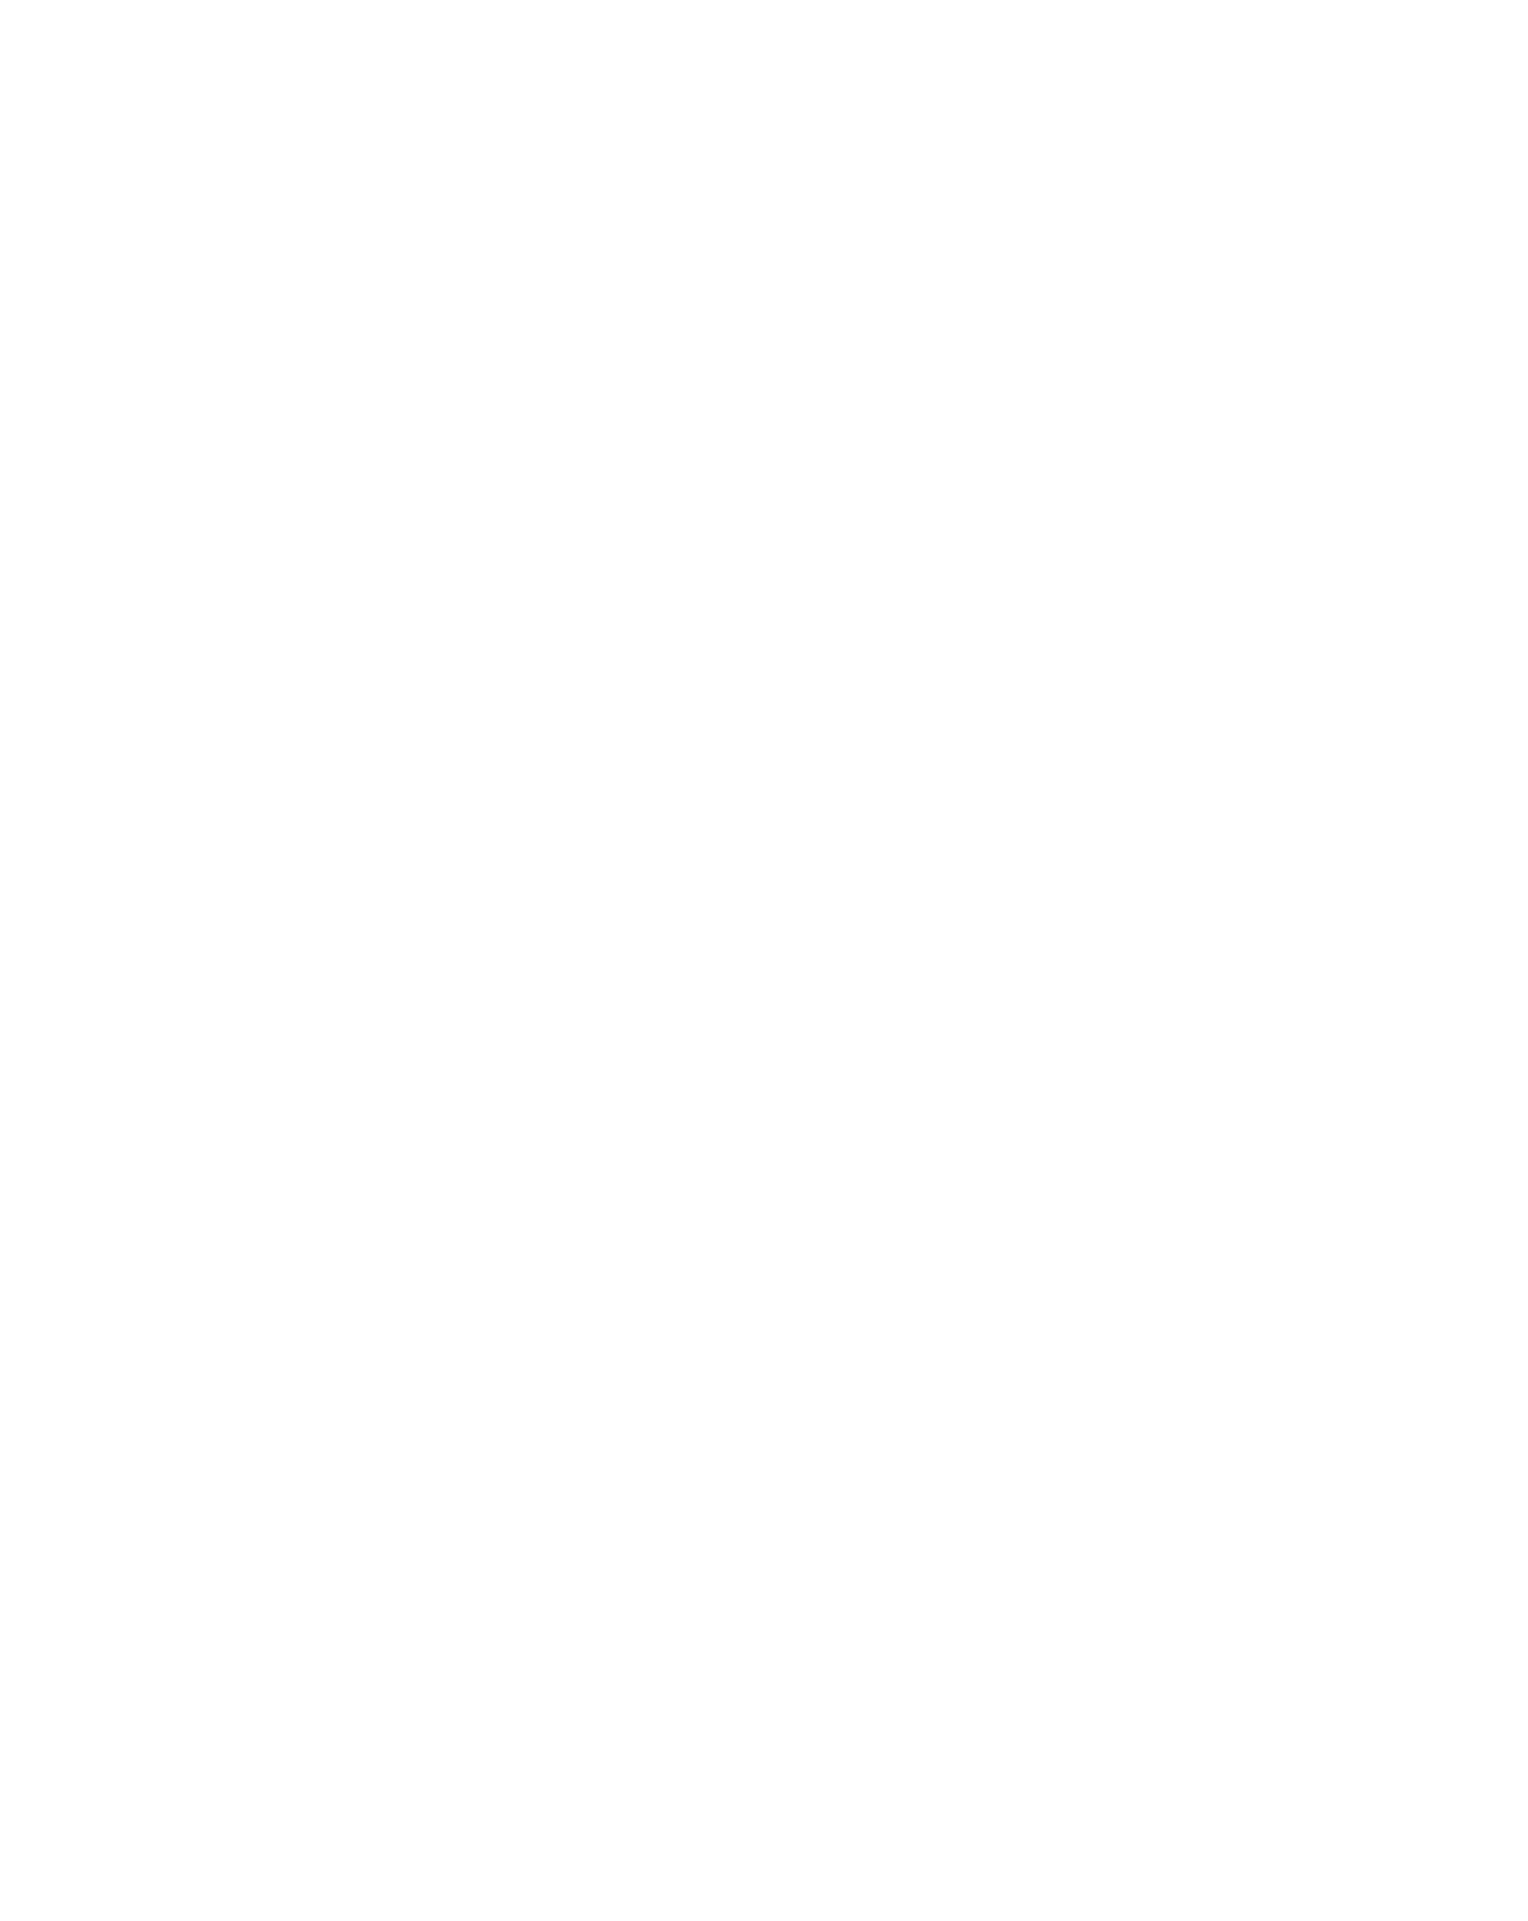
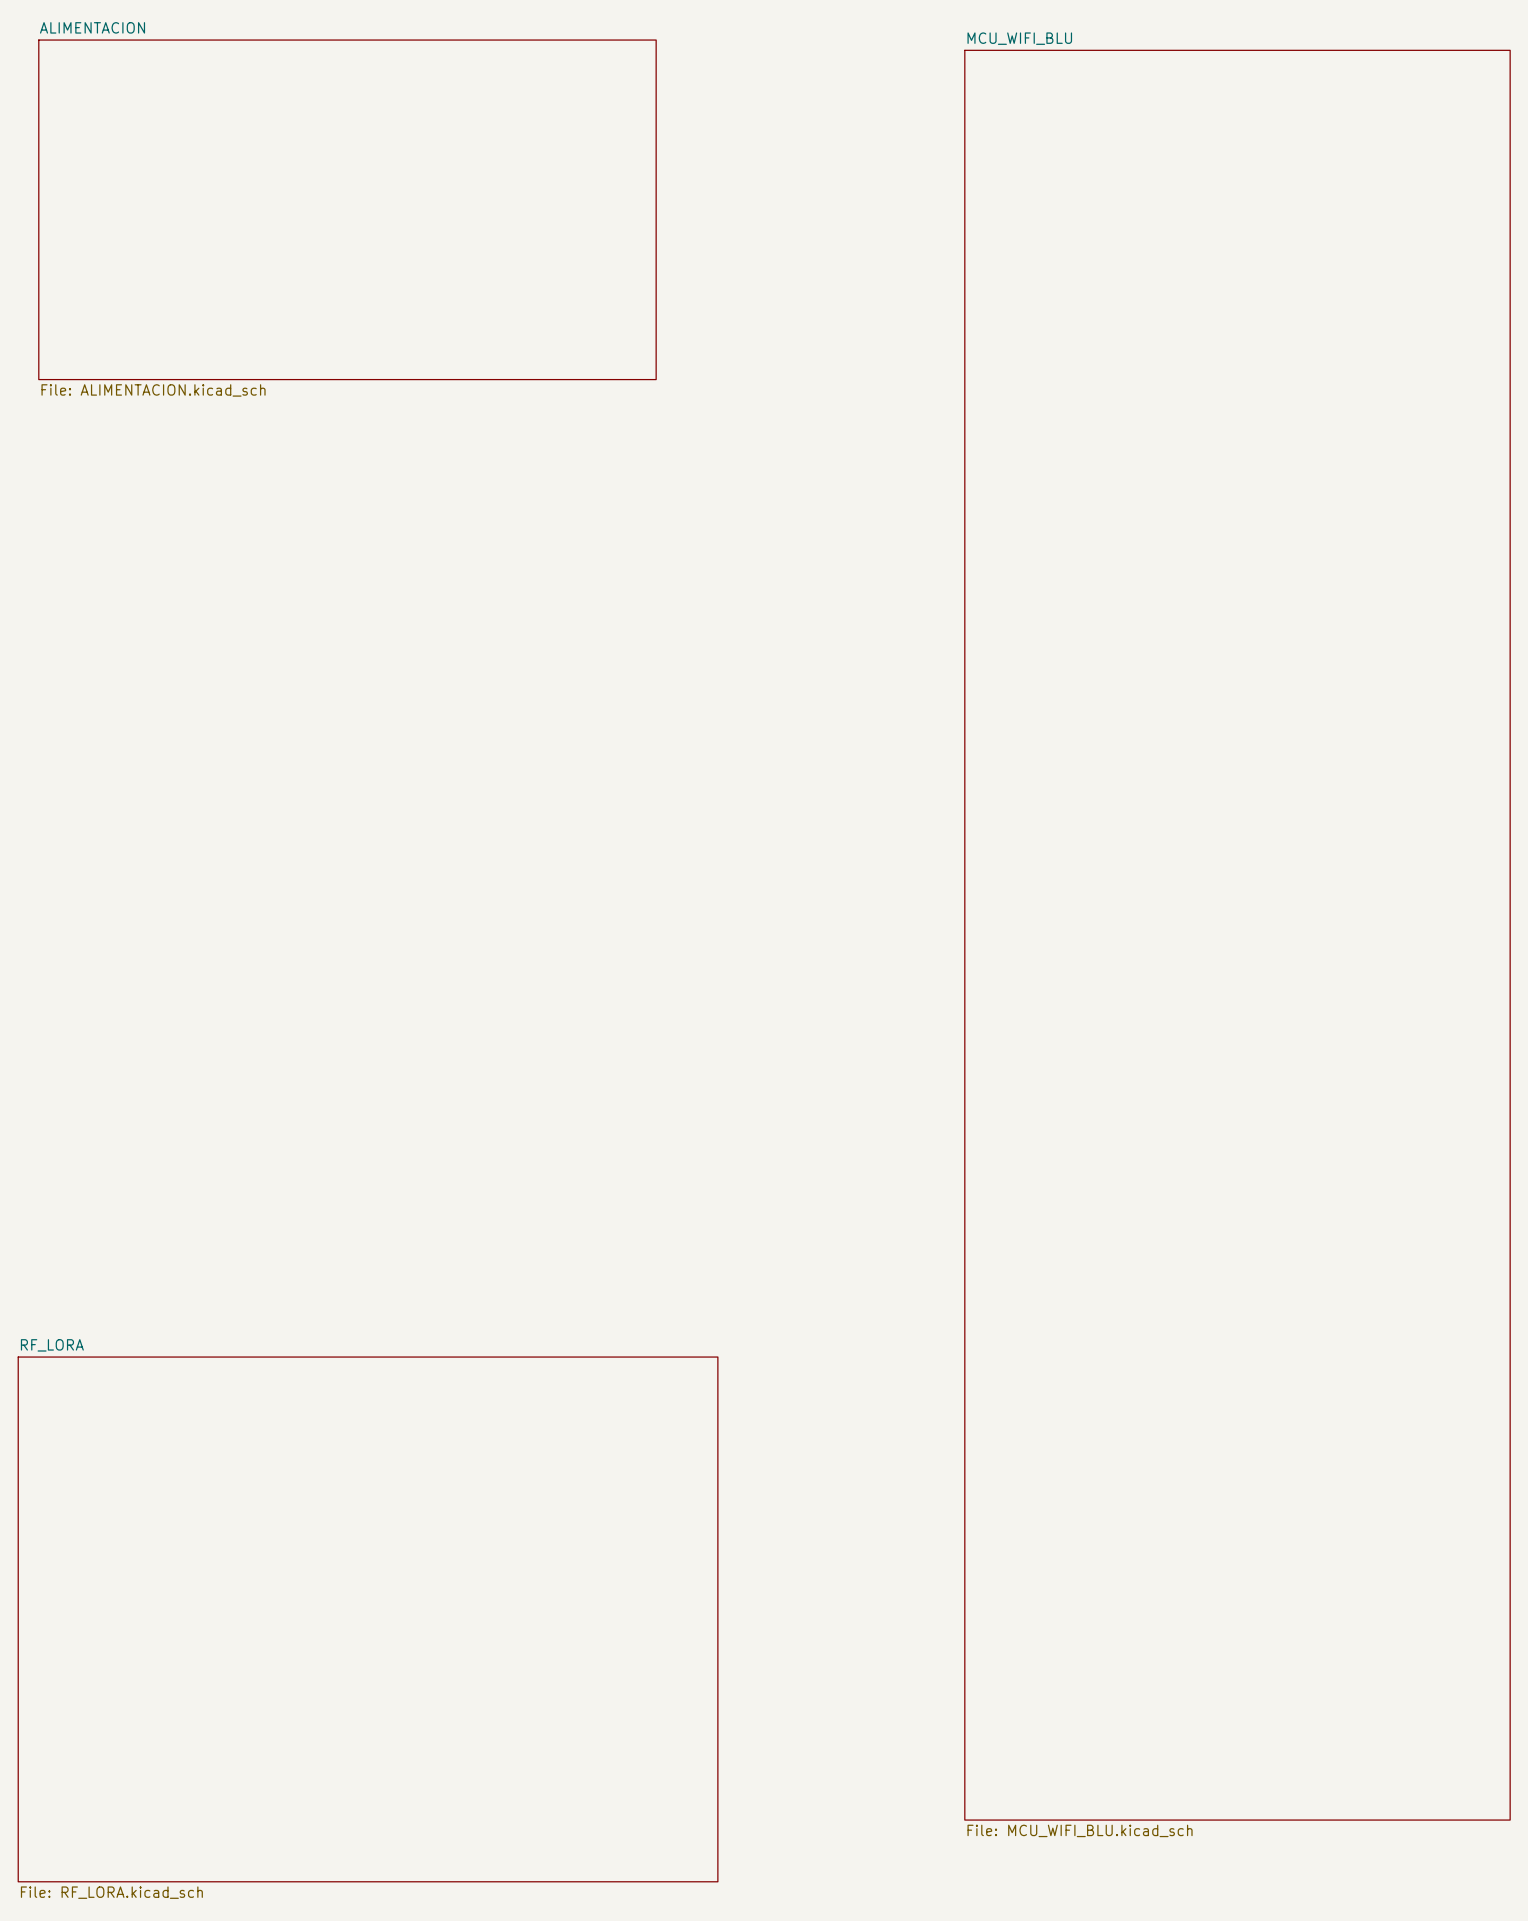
sheet ALIMENTACION: none -> File: ALIMENTACION.kicad_sch (347, 209)
sheet MCU_WIFI_BLU: none -> File: MCU_WIFI_BLU.kicad_sch (1237, 935)
sheet RF_LORA: none -> File: RF_LORA.kicad_sch (368, 1619)

